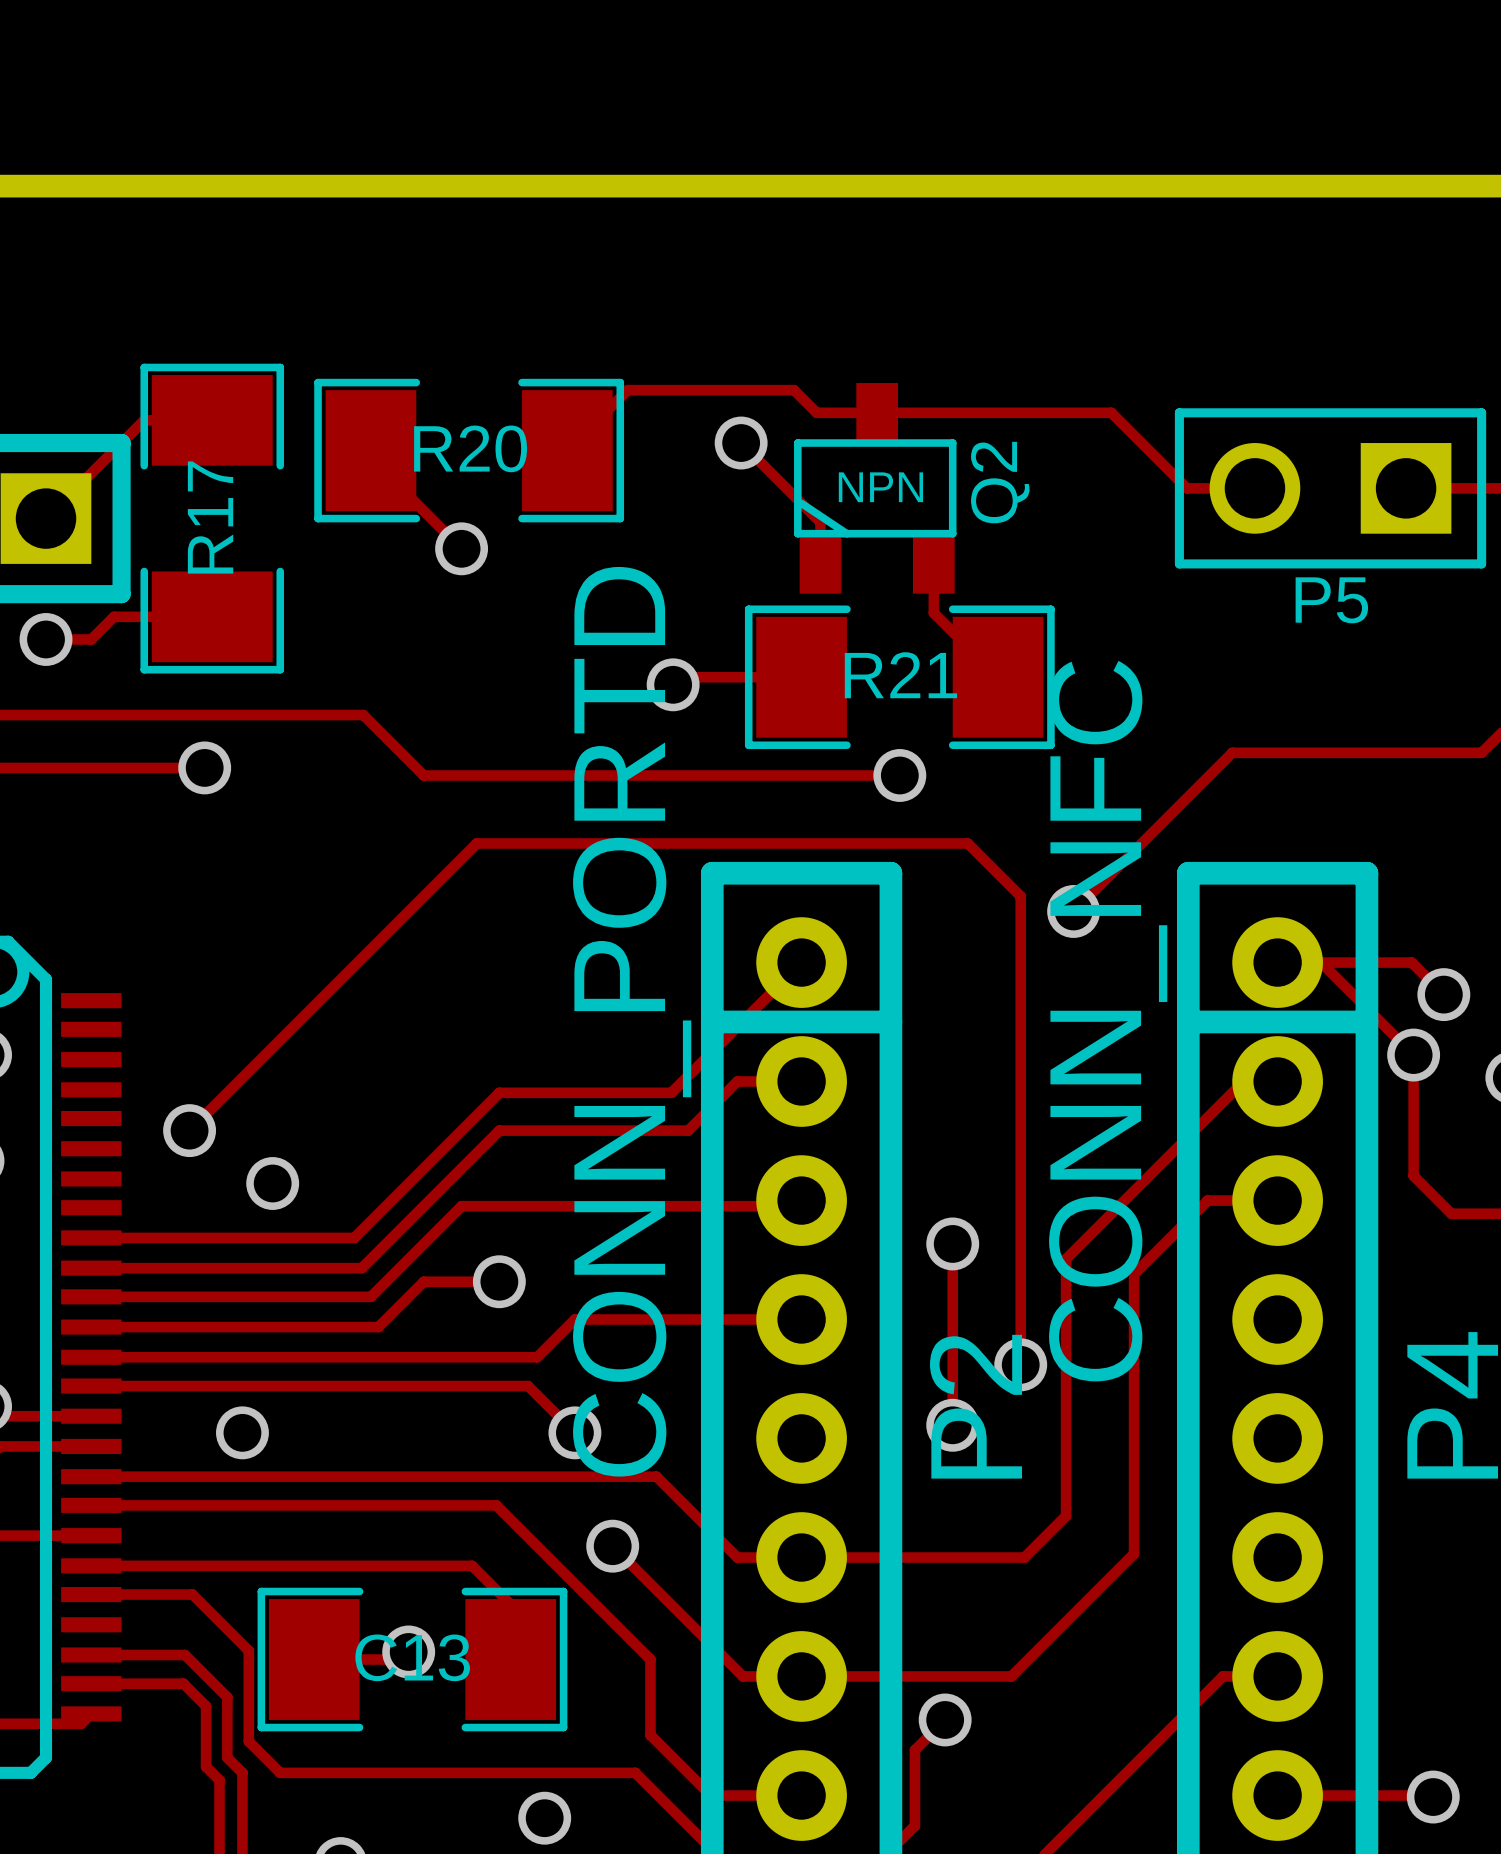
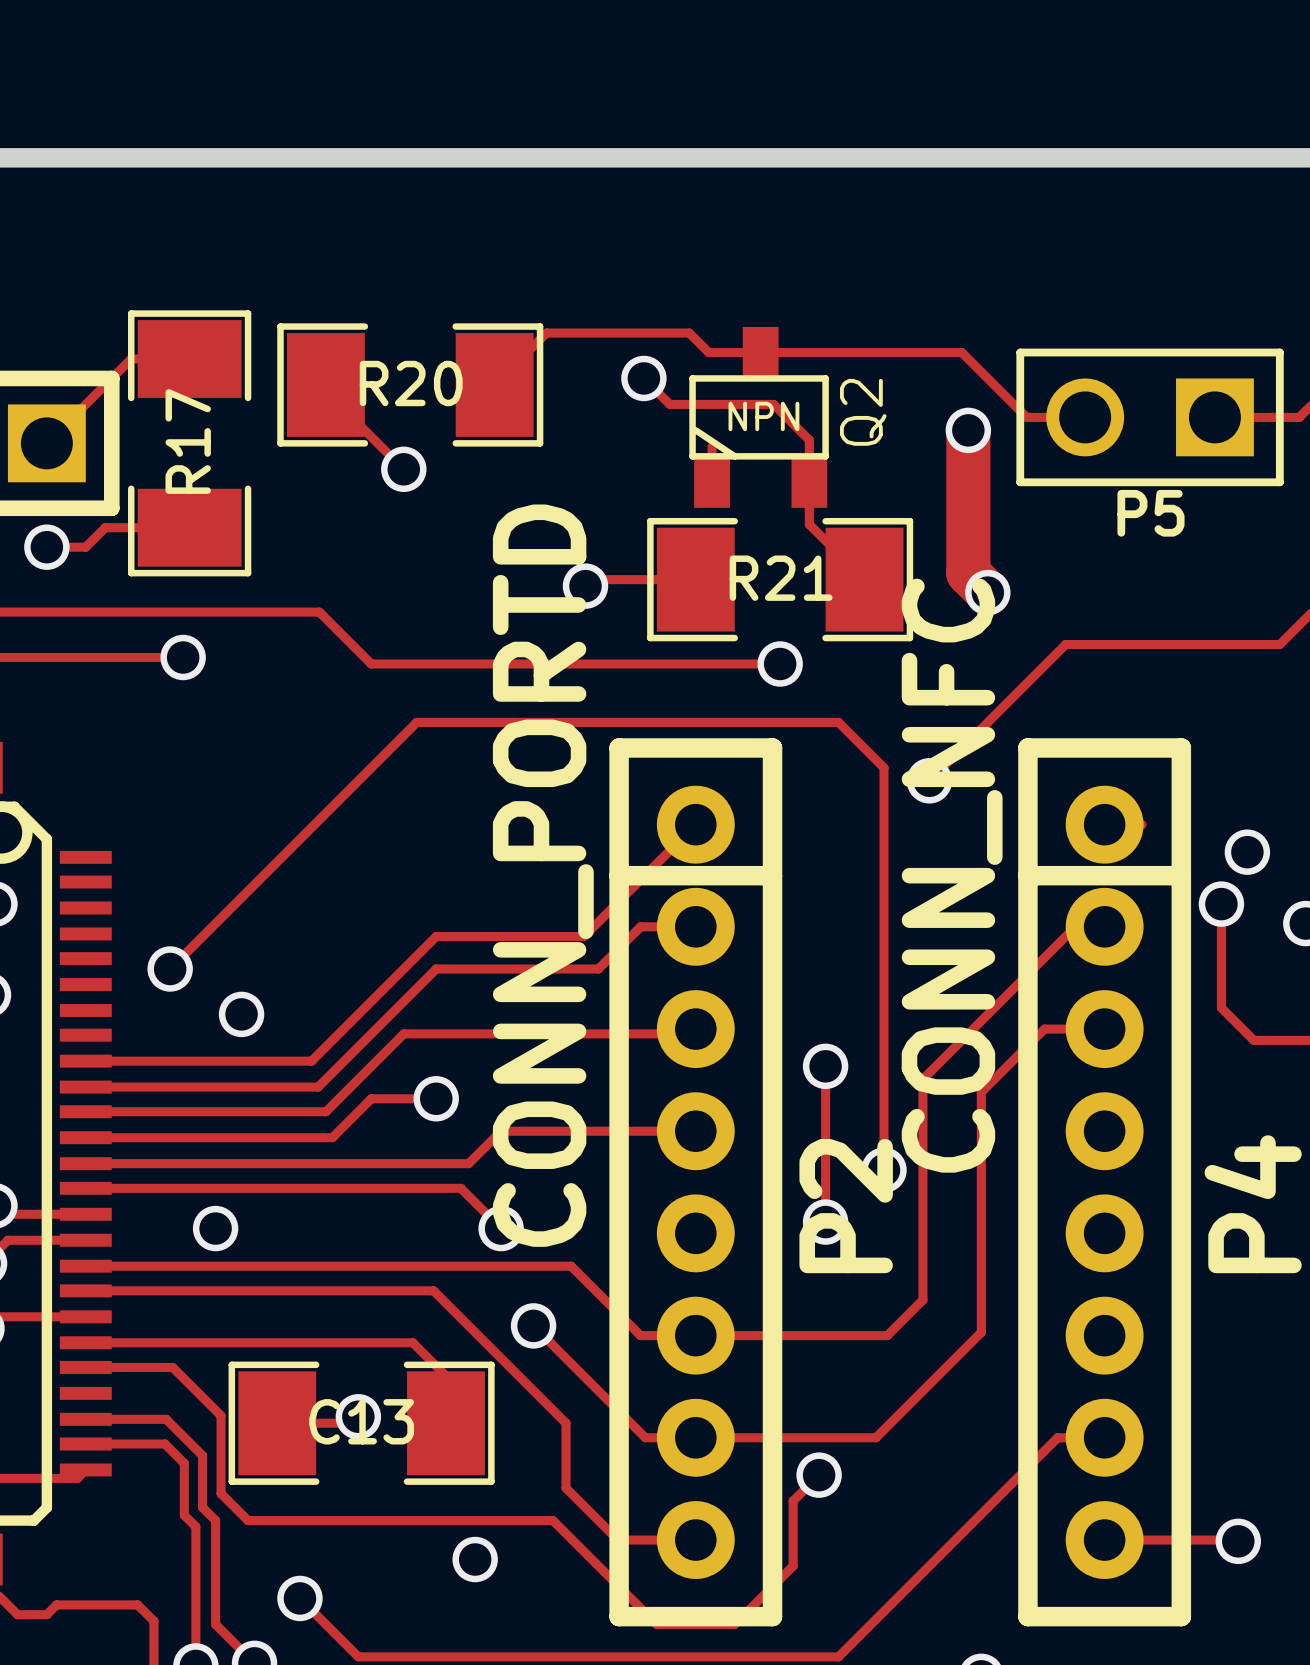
track: (771, 473) (820, 522) -> (669, 404) (773, 404) (809, 440) (809, 482)
track: none -> (968, 430) (968, 573) (987, 592)
via: none -> (968, 430)
via: none -> (987, 592)
track: (1443, 994) (1411, 962) (1321, 962) (1413, 1055) -> none

